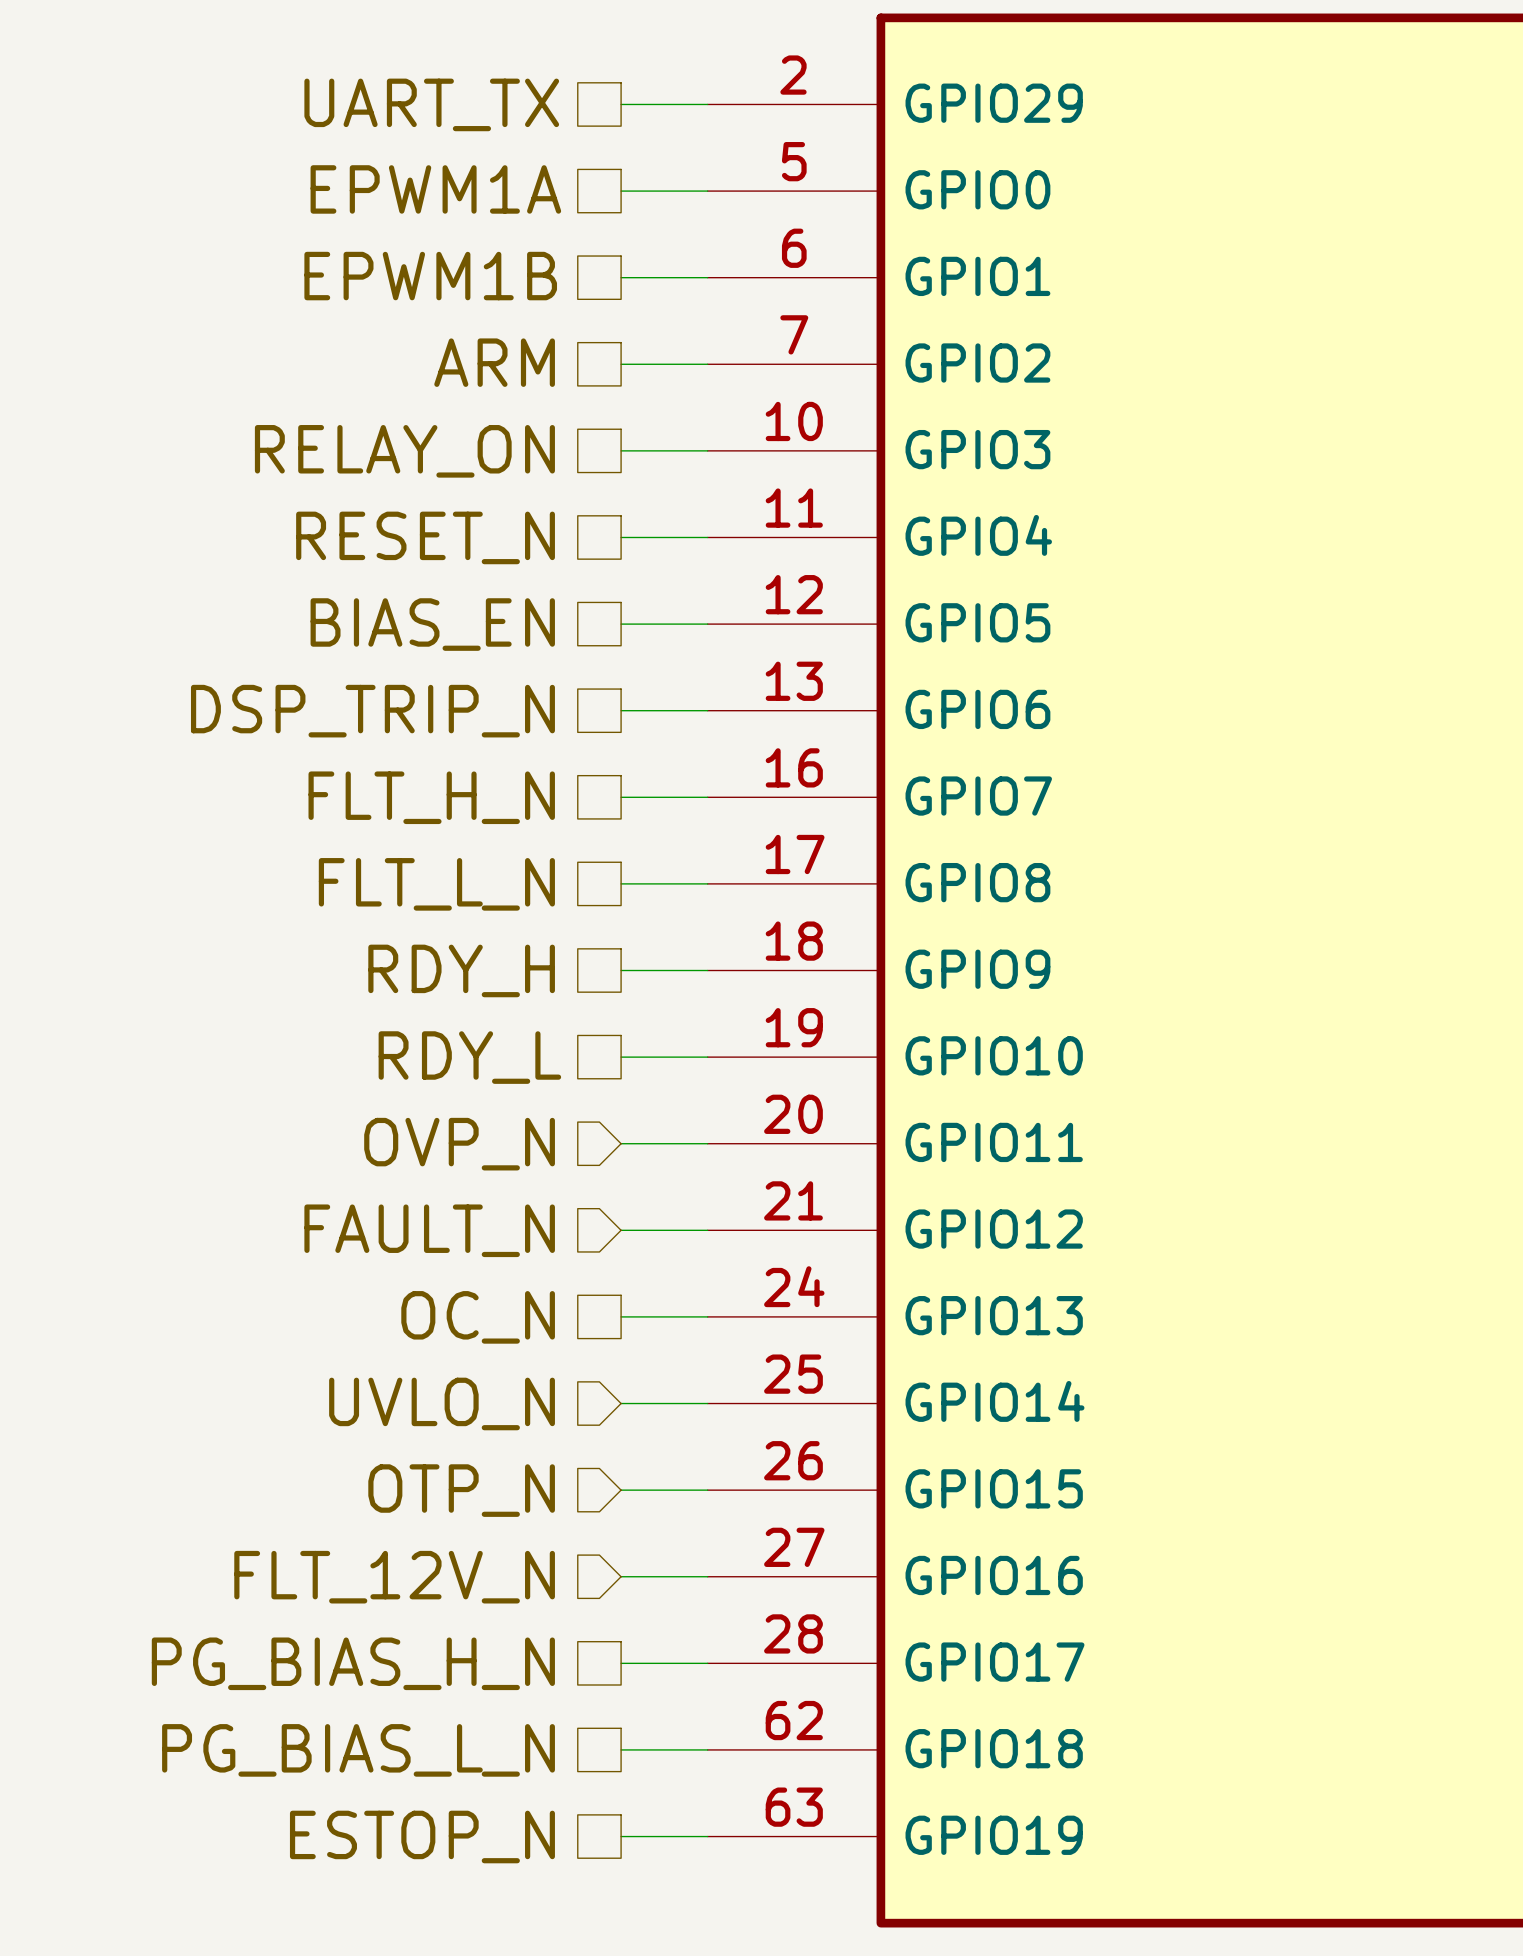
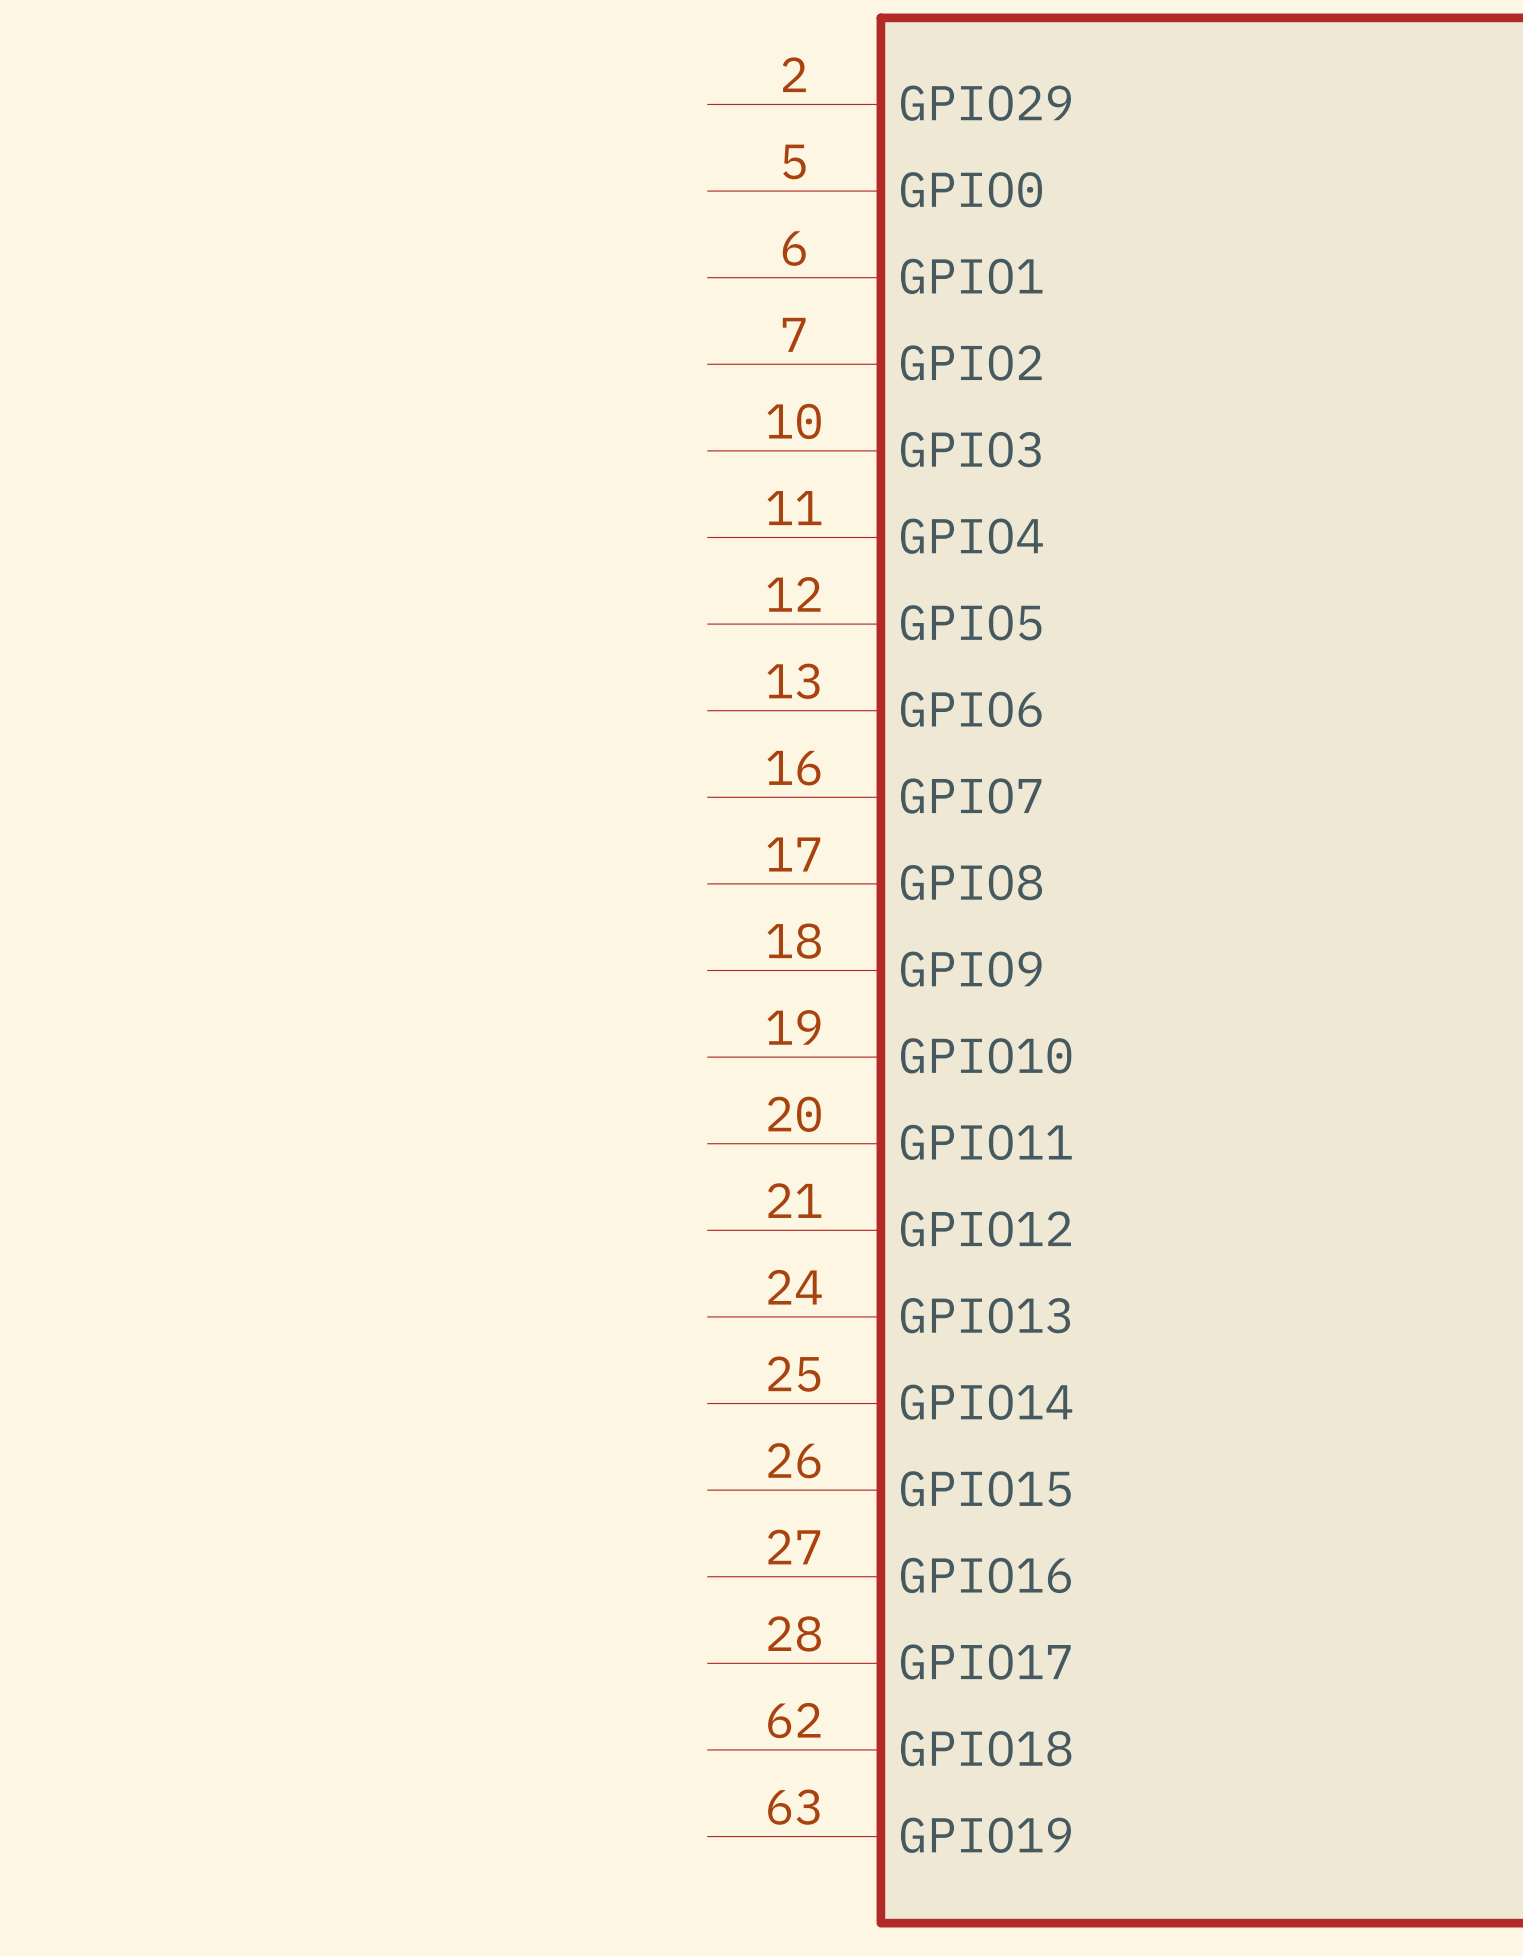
hierarchical label: UART_TX (431, 104) -> none
wire: (621, 104) (707, 104) -> none
hierarchical label: EPWM1A (435, 189) -> none
wire: (621, 191) (707, 191) -> none
hierarchical label: EPWM1B (430, 276) -> none
wire: (621, 277) (707, 277) -> none
hierarchical label: ARM (494, 362) -> none
wire: (621, 364) (707, 364) -> none
wire: (621, 450) (707, 450) -> none
hierarchical label: RELAY_ON (404, 451) -> none
hierarchical label: RESET_N (425, 537) -> none
wire: (621, 537) (707, 537) -> none
hierarchical label: BIAS_EN (432, 624) -> none
wire: (621, 624) (707, 624) -> none
wire: (621, 710) (707, 710) -> none
hierarchical label: DSP_TRIP_N (372, 711) -> none
hierarchical label: FLT_H_N (431, 797) -> none
wire: (621, 797) (707, 797) -> none
wire: (621, 883) (707, 883) -> none
hierarchical label: FLT_L_N (436, 884) -> none
hierarchical label: RDY_H (461, 970) -> none
wire: (621, 970) (707, 970) -> none
hierarchical label: RDY_L (469, 1057) -> none
wire: (621, 1057) (707, 1057) -> none
wire: (621, 1143) (707, 1143) -> none
hierarchical label: OVP_N (459, 1144) -> none
hierarchical label: FAULT_N (429, 1230) -> none
wire: (621, 1230) (707, 1230) -> none
wire: (621, 1316) (707, 1316) -> none
hierarchical label: OC_N (478, 1317) -> none
hierarchical label: UVLO_N (442, 1403) -> none
wire: (621, 1403) (707, 1403) -> none
hierarchical label: OTP_N (461, 1490) -> none
wire: (621, 1490) (707, 1490) -> none
wire: (621, 1576) (707, 1576) -> none
hierarchical label: FLT_12V_N (394, 1577) -> none
hierarchical label: PG_BIAS_H_N (353, 1663) -> none
wire: (621, 1663) (707, 1663) -> none
wire: (621, 1749) (707, 1749) -> none
hierarchical label: PG_BIAS_L_N (358, 1750) -> none
wire: (621, 1836) (707, 1836) -> none
hierarchical label: ESTOP_N (422, 1837) -> none

